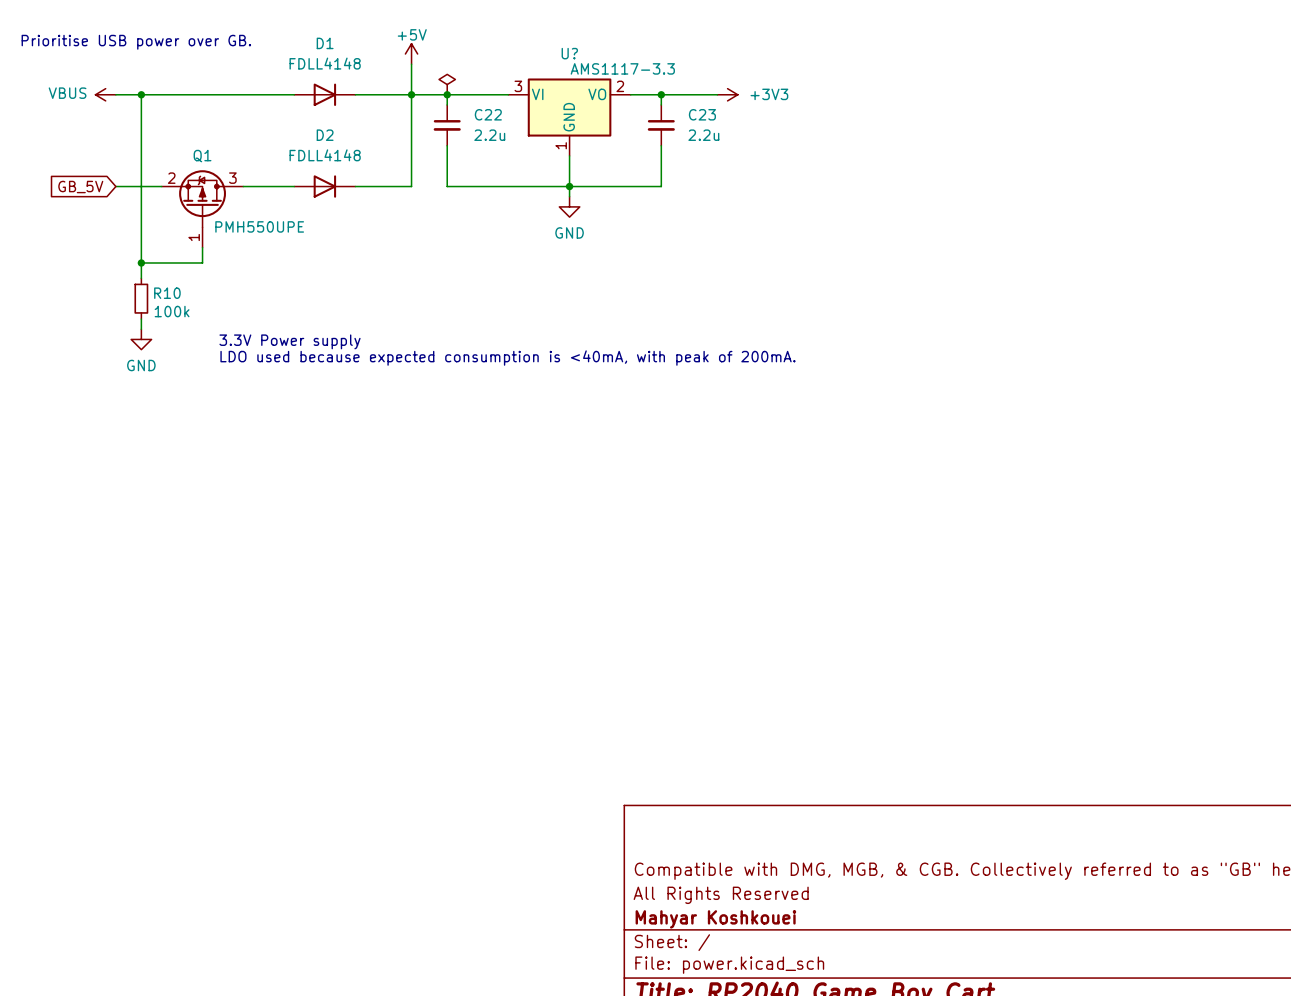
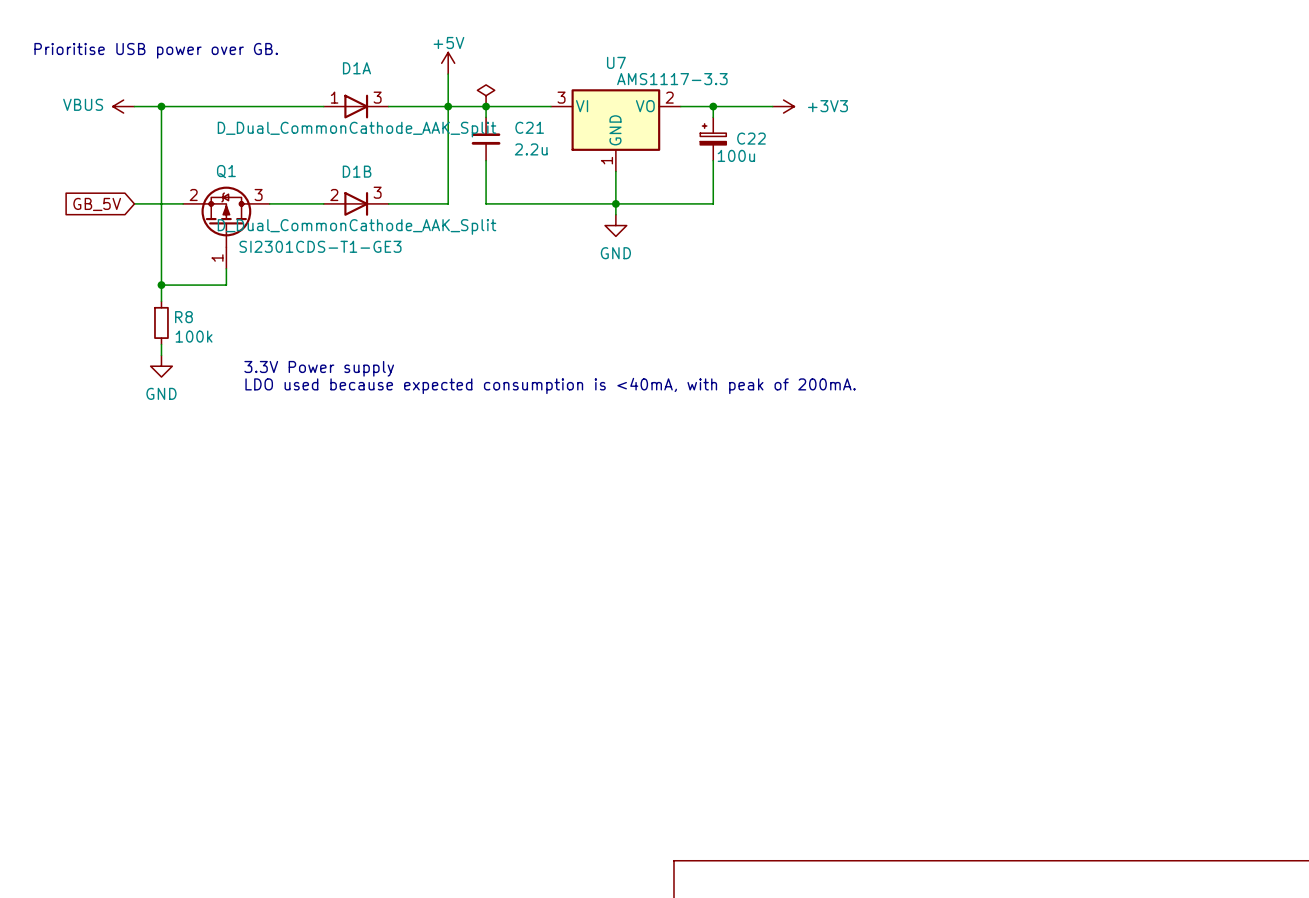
U? name: U? (569, 53) -> U7 (616, 62)
D1: FDLL4148 (324, 94) -> none
D1A: none -> D_Dual_CommonCathode_AAK_Split (356, 106)
C22 name: C22 (488, 114) -> C21 (529, 127)
C23: 2.2u (661, 125) -> none
C22: none -> 100u (713, 139)
D2: FDLL4148 (324, 186) -> none
D1B: none -> D_Dual_CommonCathode_AAK_Split (356, 203)
Q1 value: PMH550UPE (259, 226) -> SI2301CDS-T1-GE3 (320, 246)
R10 name: R10 (167, 293) -> R8 (183, 317)

